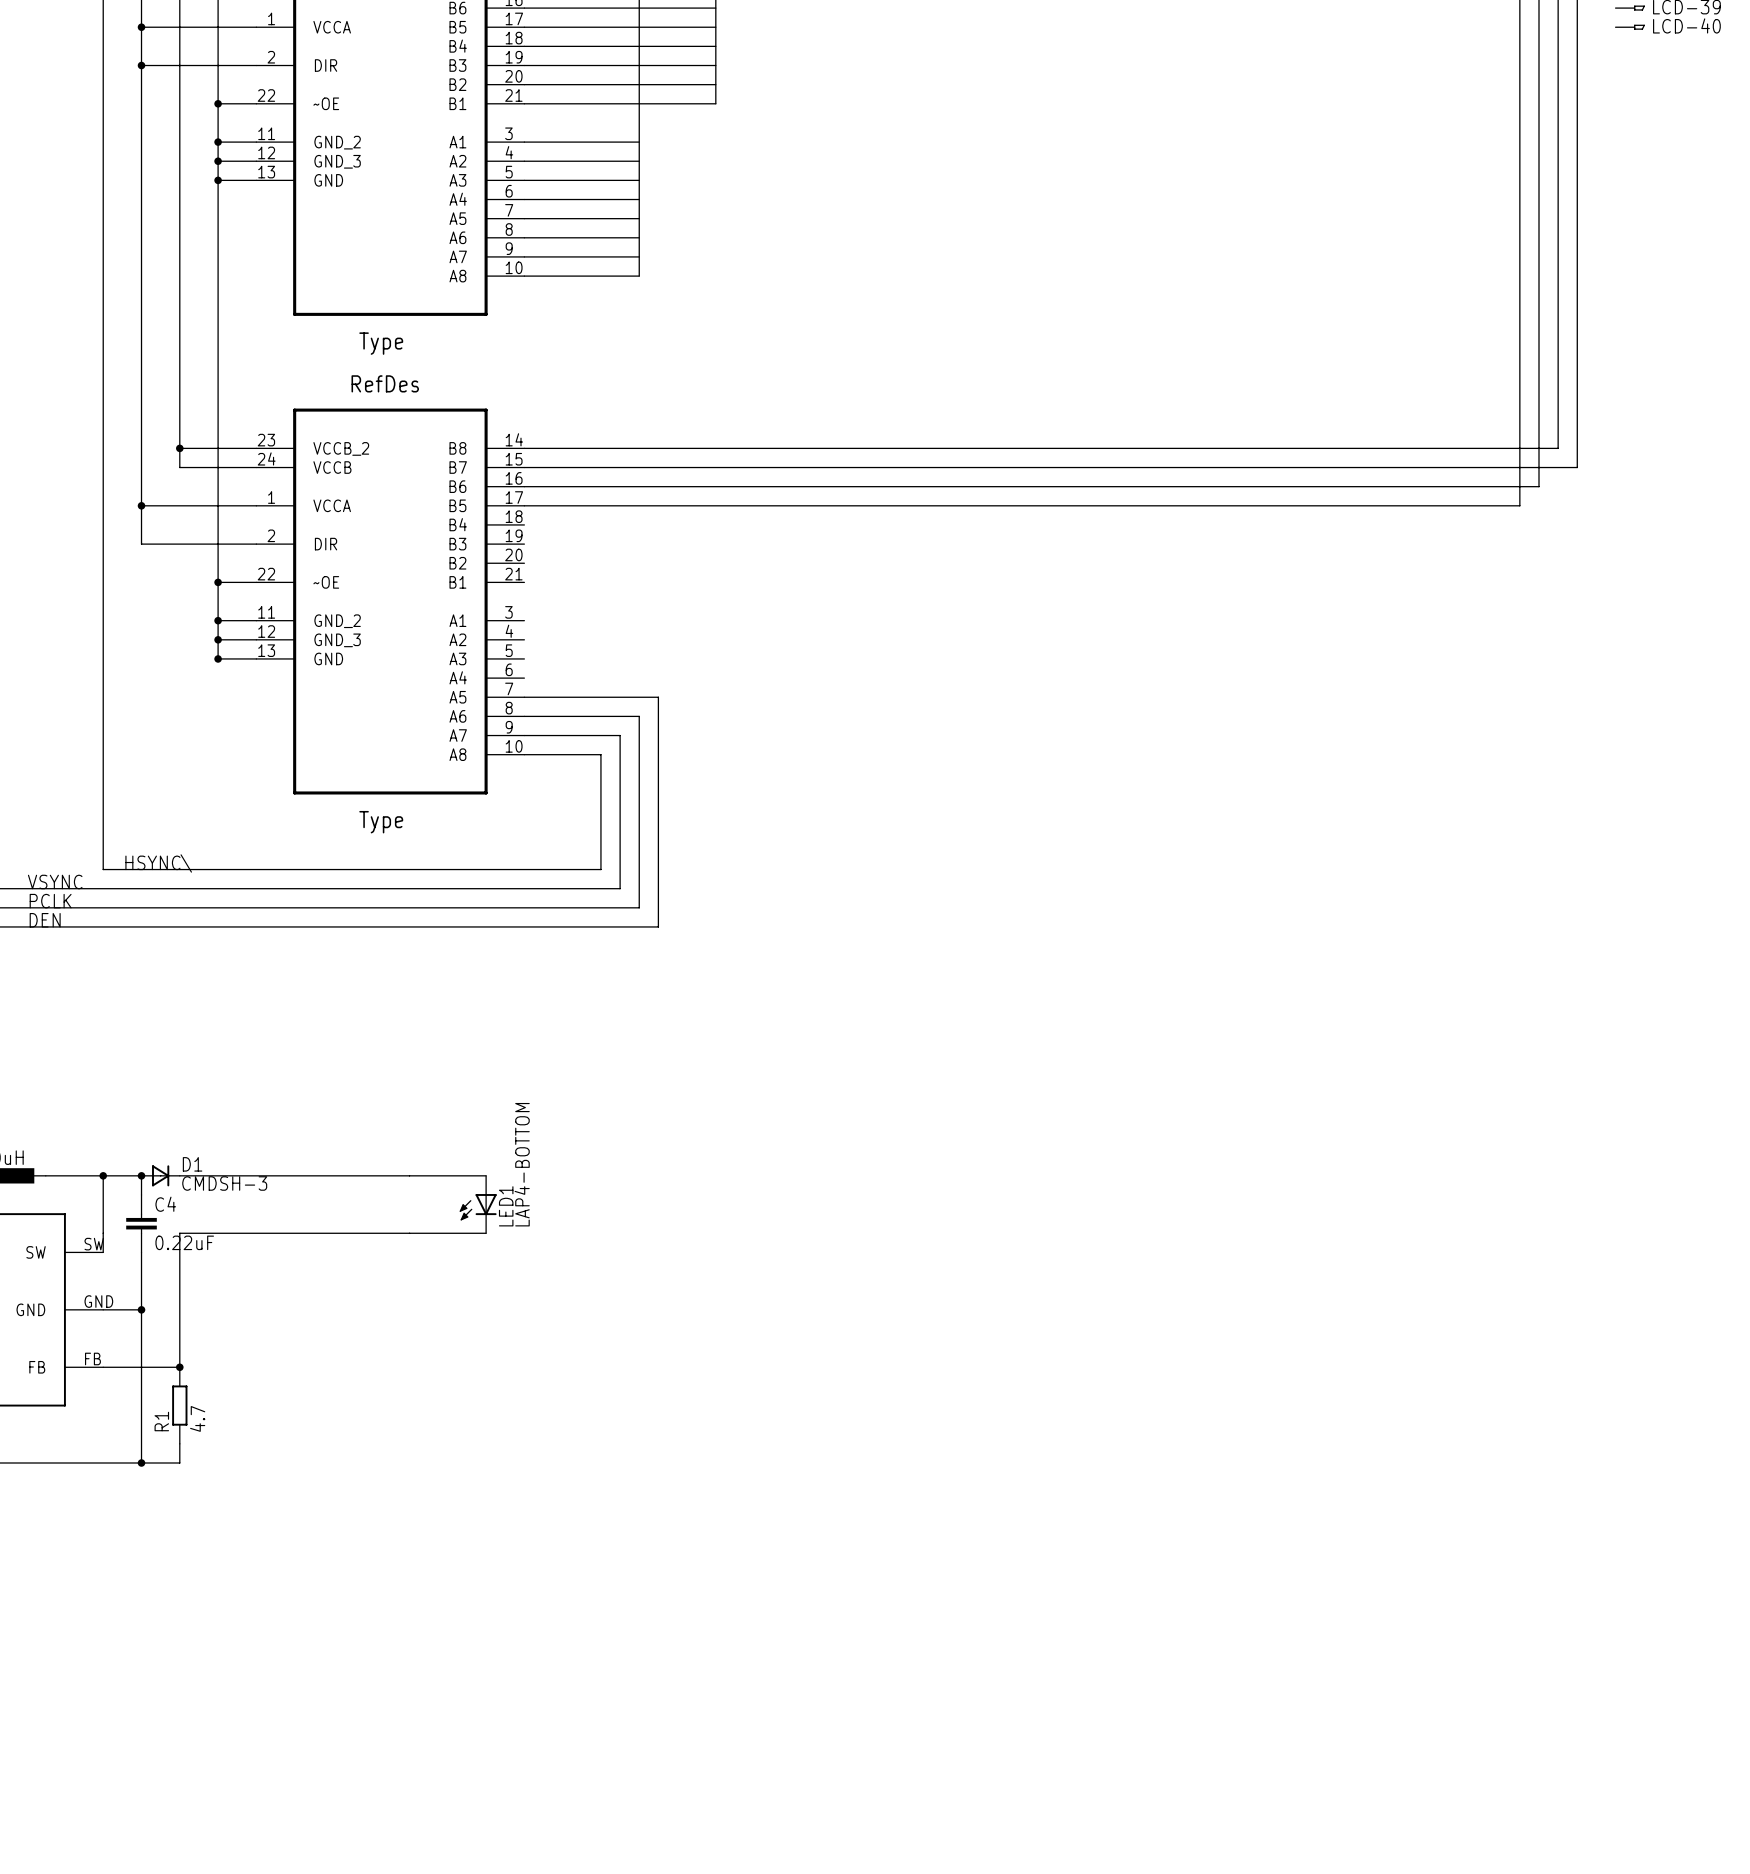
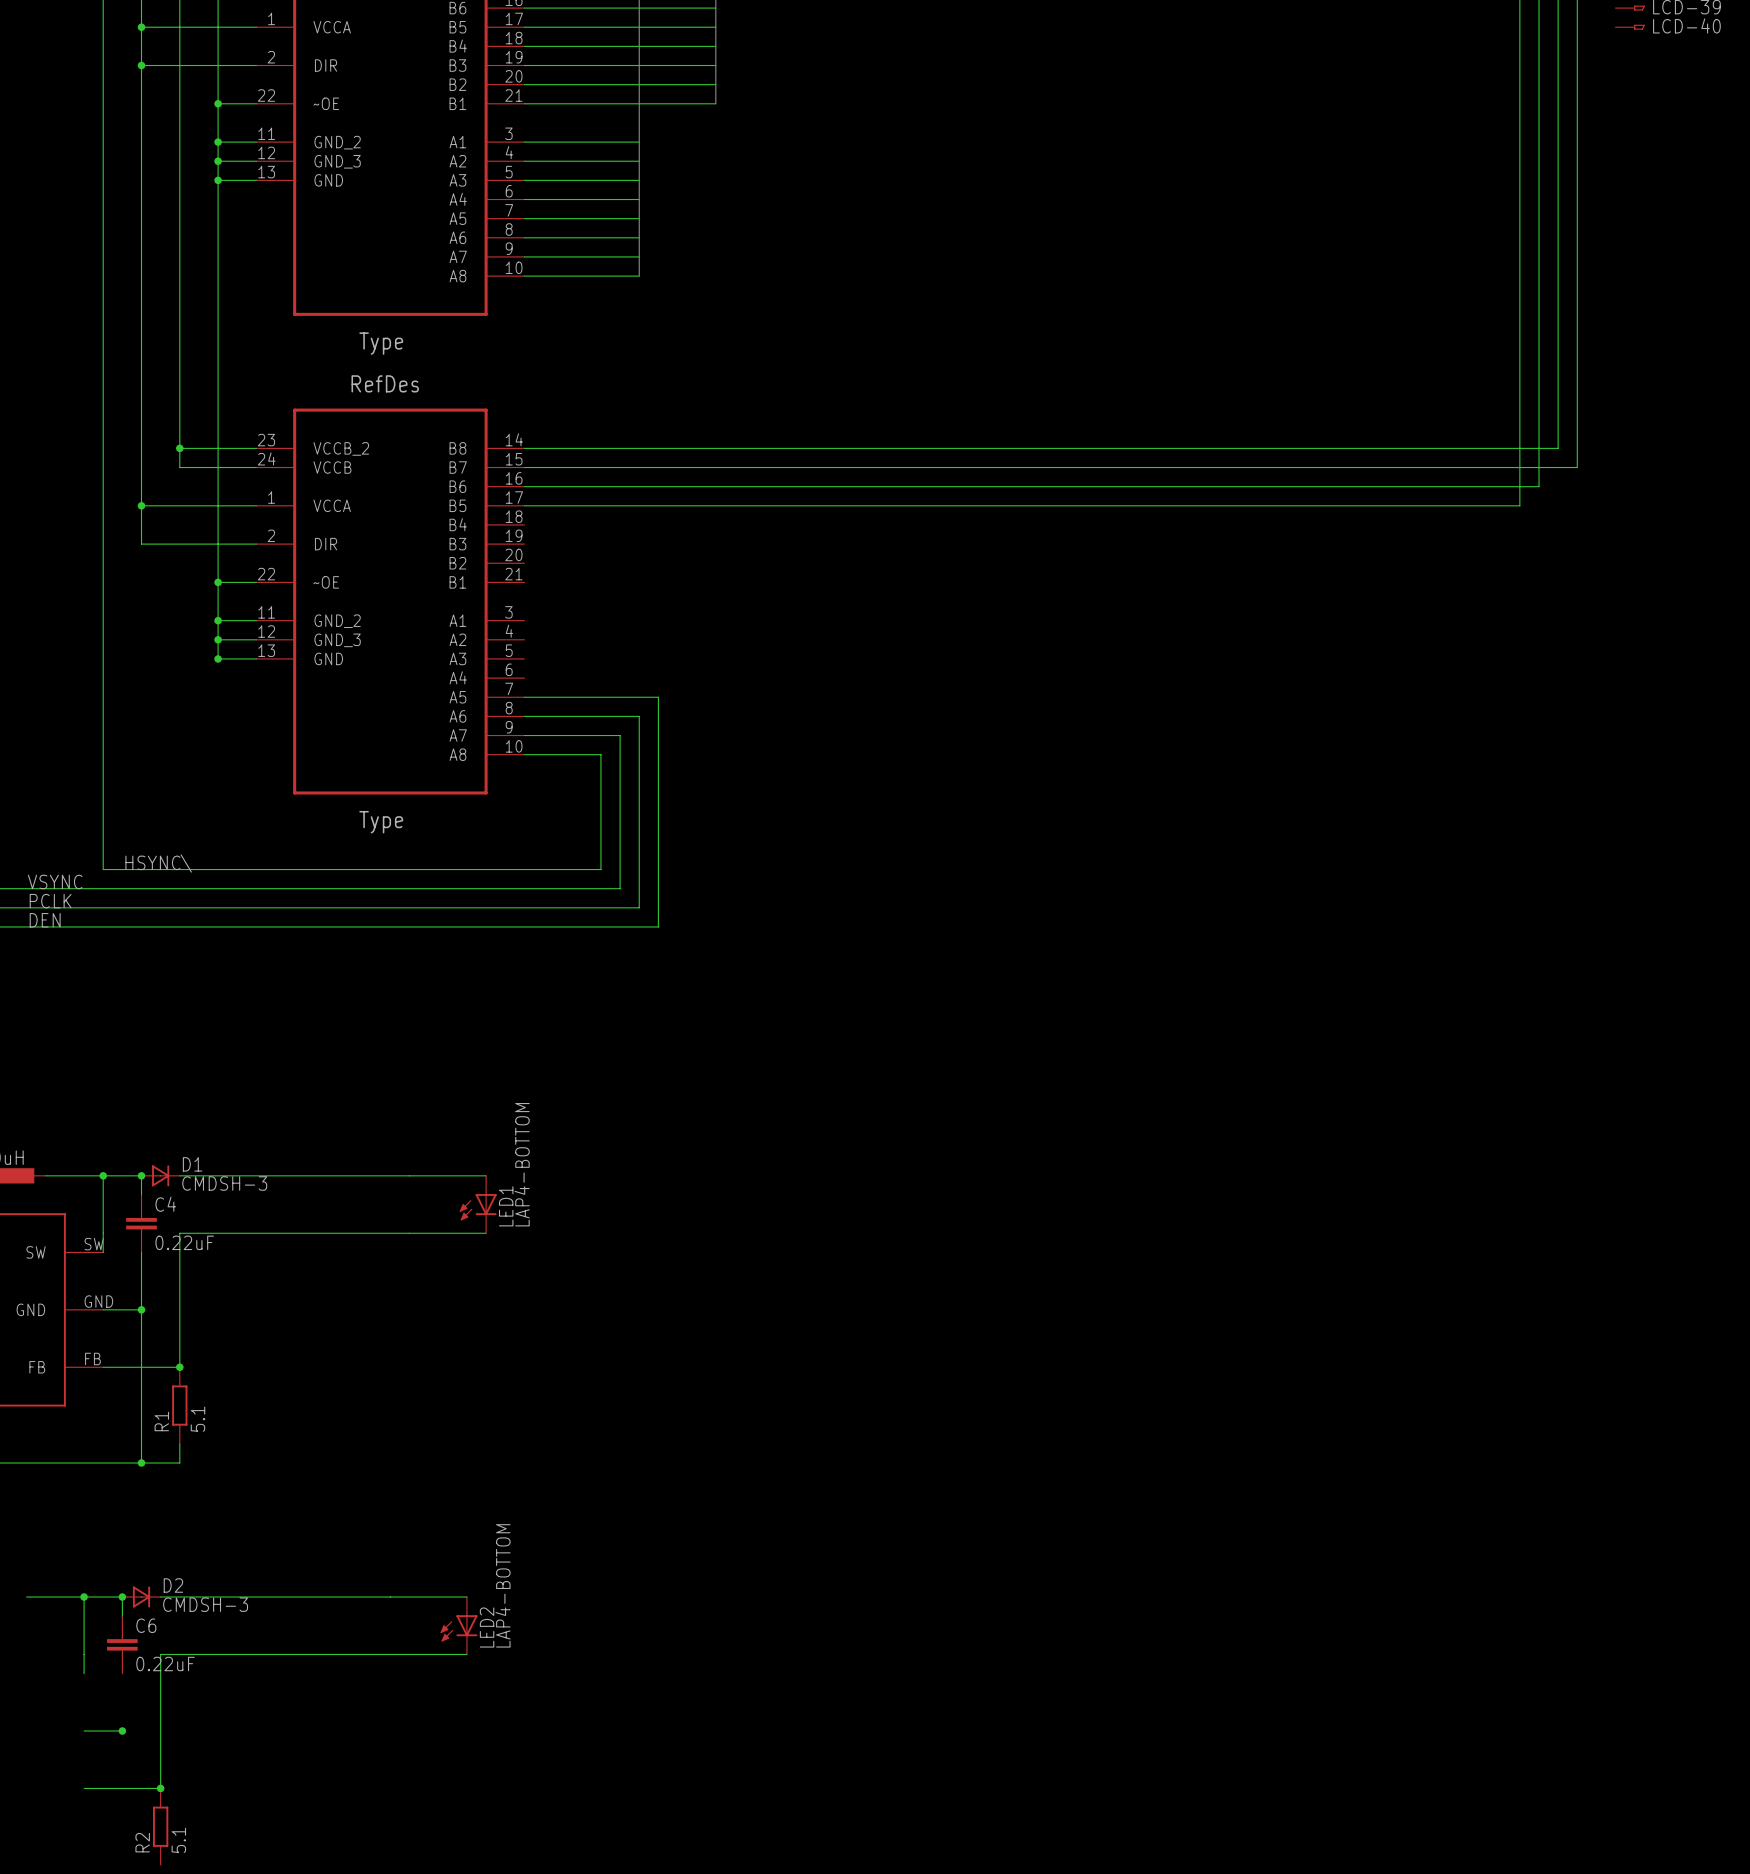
R1 value: 4.7 (197, 1418) -> 5.1 (197, 1419)
wire: none -> (26, 1597) (122, 1597) (122, 1616)
wire: none -> (84, 1597) (84, 1673)
junction: none -> (84, 1597)
junction: none -> (122, 1597)
D2: none -> CMDSH-3 (141, 1597)
wire: none -> (160, 1597) (466, 1597)
LED2: none -> LAP4-BOTTOM (459, 1625)
C6: none -> 0.22uF (122, 1644)
wire: none -> (466, 1654) (160, 1654) (160, 1788) (84, 1788)
wire: none -> (84, 1731) (122, 1731)
junction: none -> (122, 1731)
junction: none -> (160, 1788)
R2: none -> 5.1 (160, 1826)

